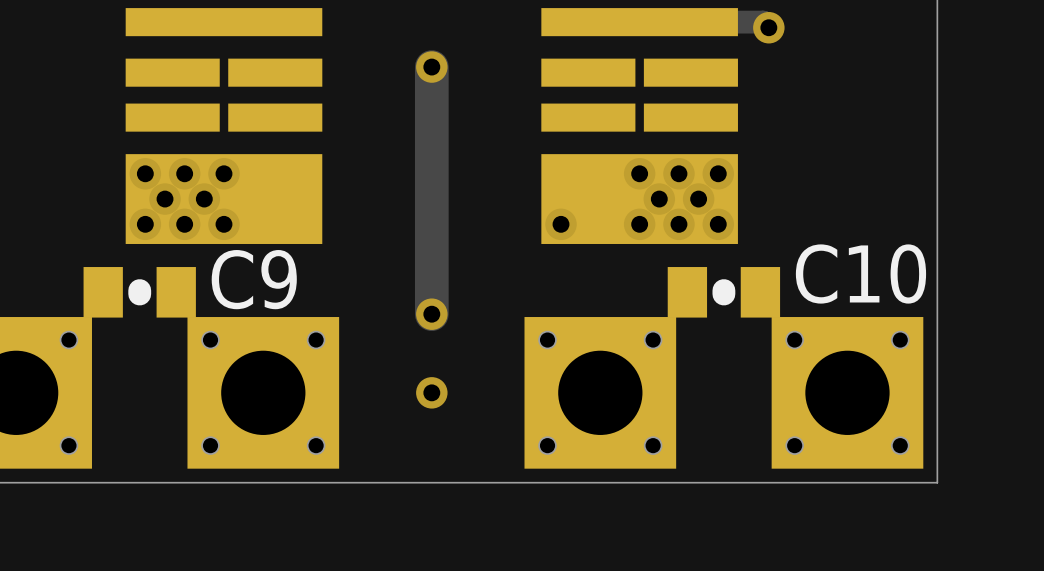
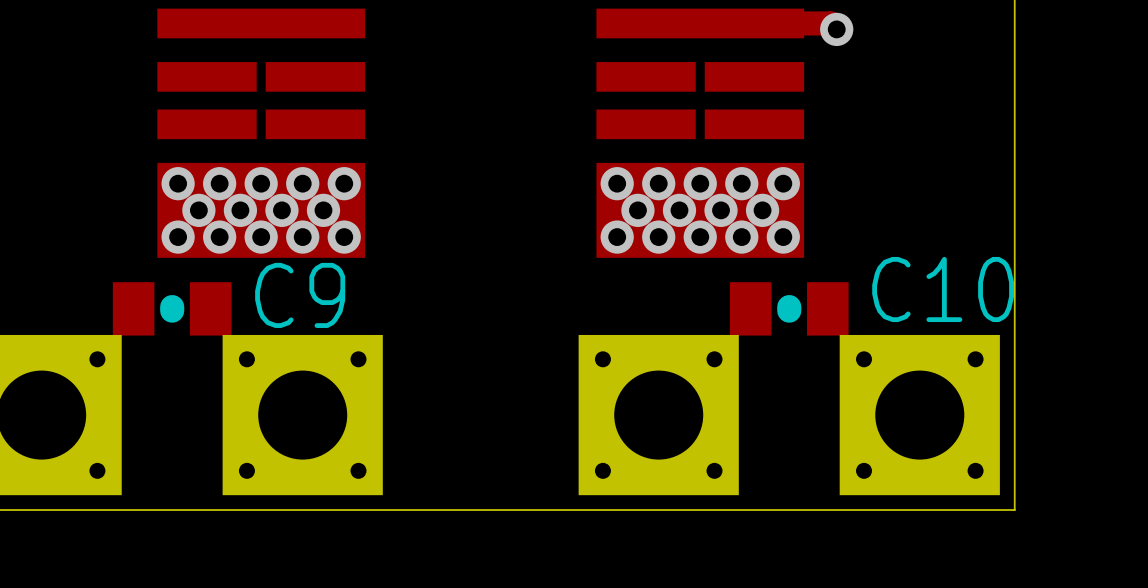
track: (431, 67) (431, 314) -> none
via: (431, 67) -> none
via: none -> (302, 183)
via: none -> (344, 183)
via: none -> (617, 183)
via: none -> (658, 183)
via: none -> (281, 210)
via: none -> (323, 210)
via: none -> (637, 210)
via: none -> (679, 210)
via: none -> (302, 237)
via: none -> (344, 237)
via: none -> (658, 237)
via: (431, 314) -> none
via: (431, 392) -> none

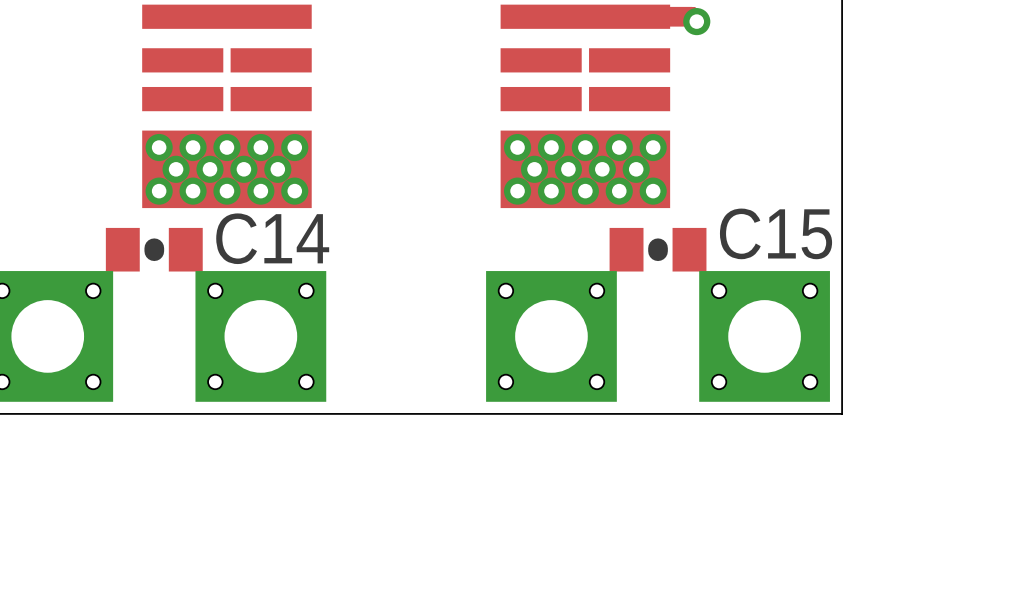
C10 name: C10 (943, 289) -> C15 (776, 233)
C9 name: C9 (300, 295) -> C14 (272, 238)

